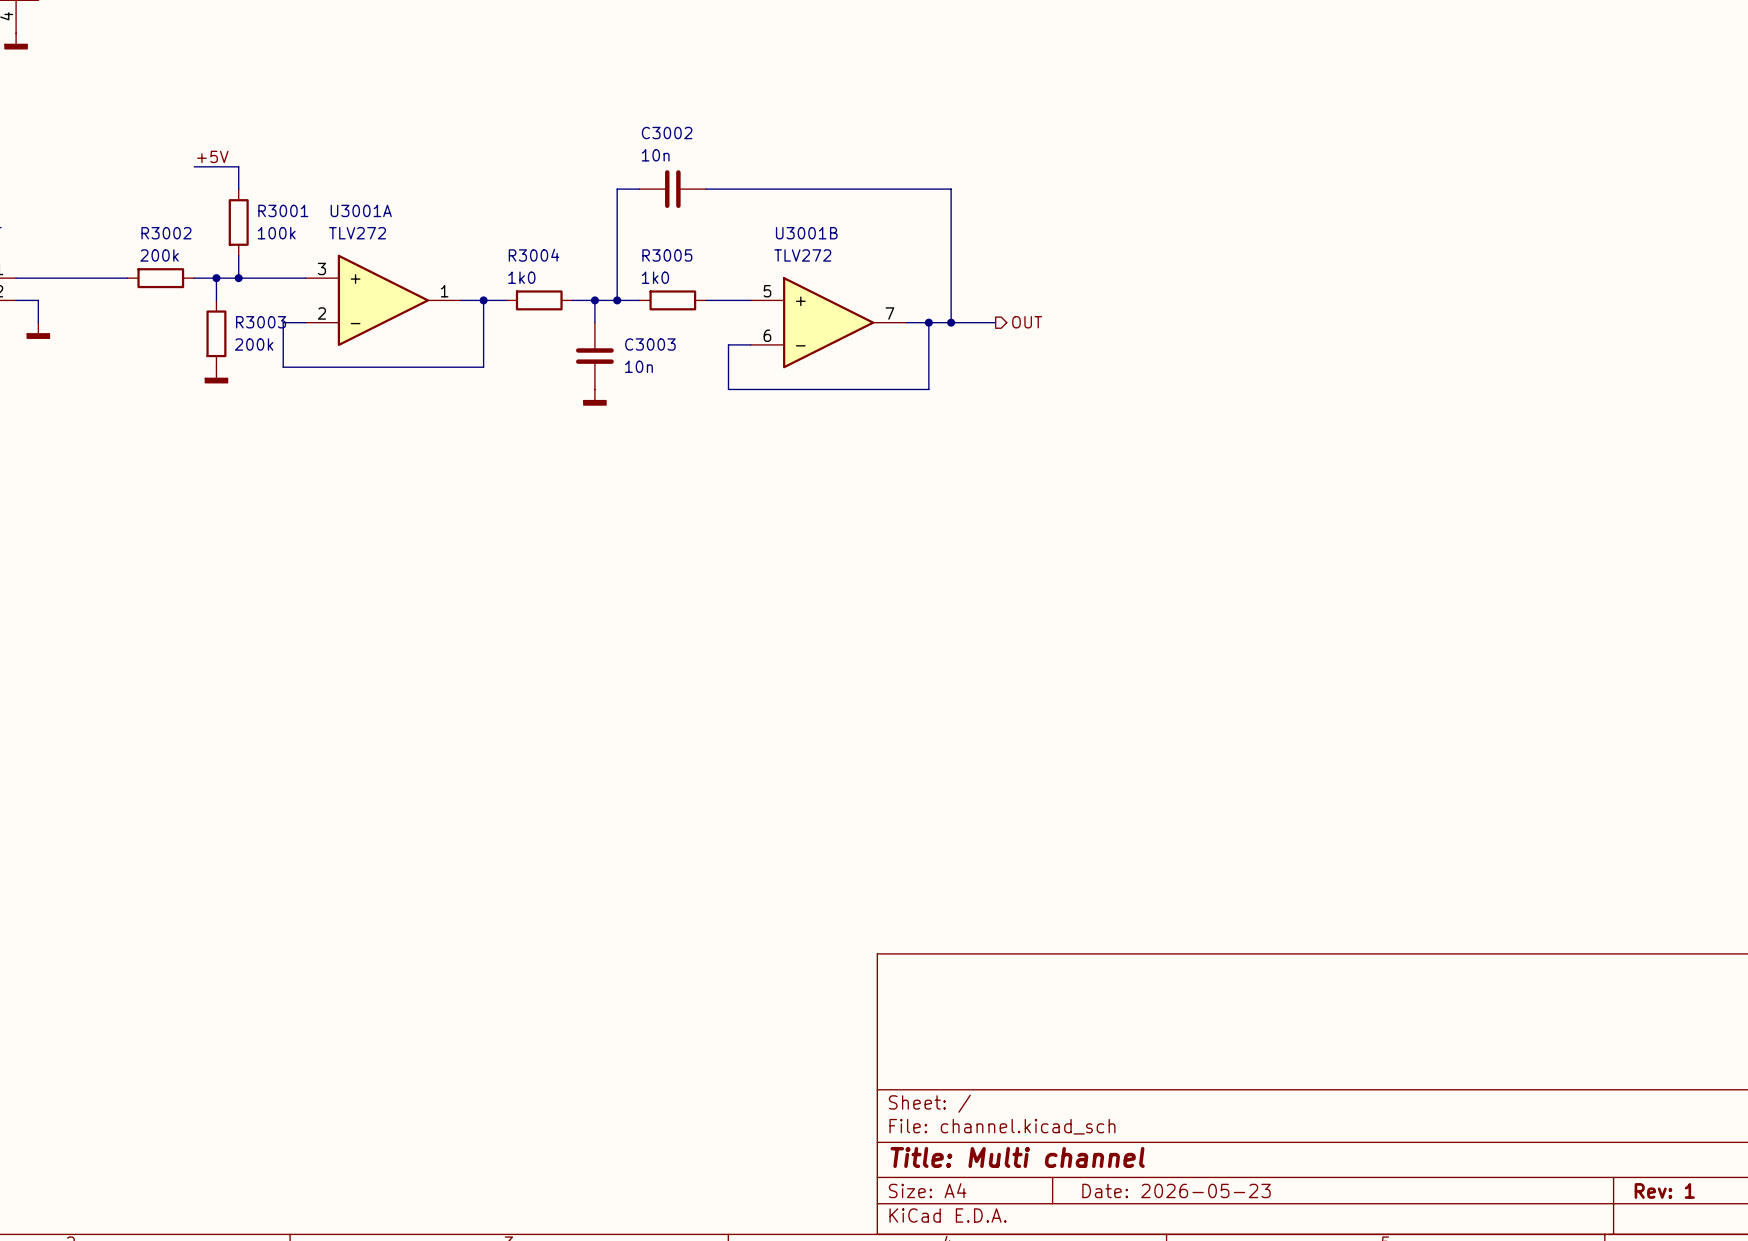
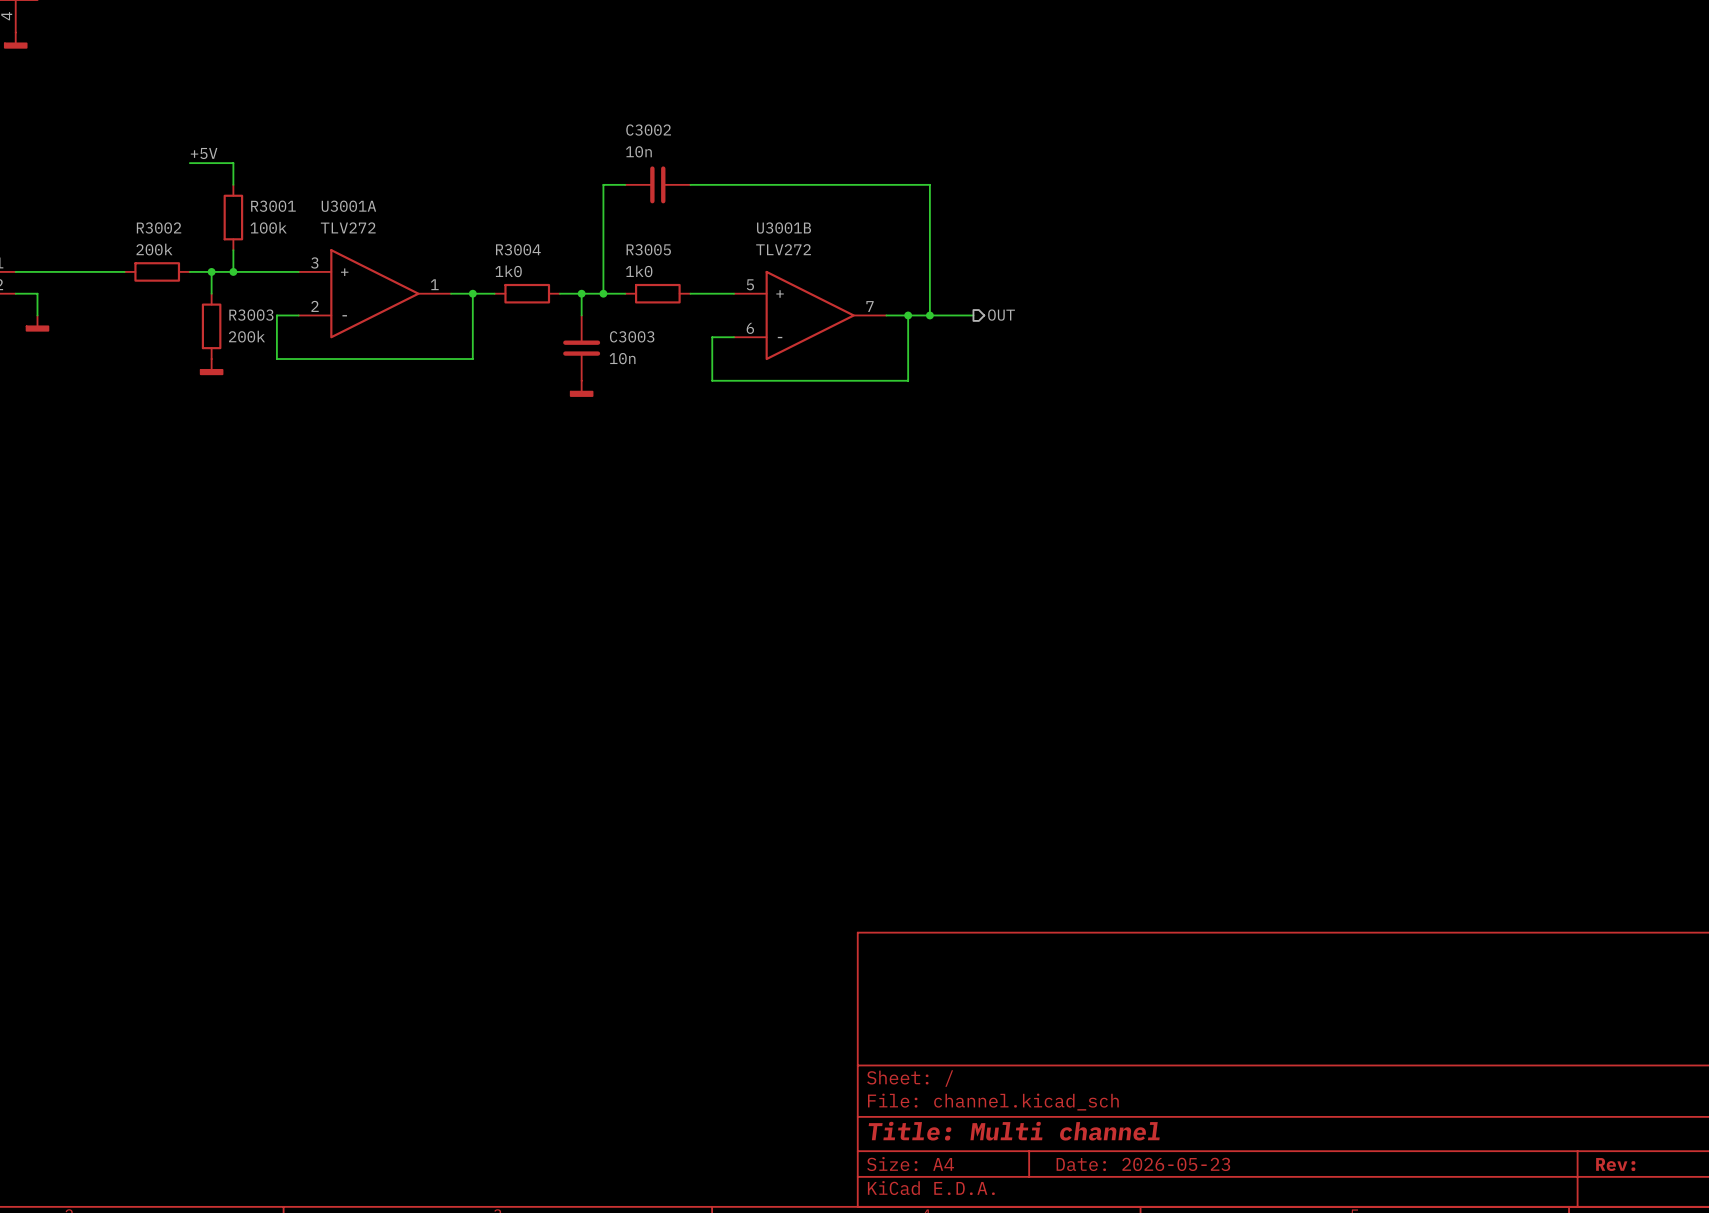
title block: Rev: 1 (1664, 1190) -> Rev: (1615, 1164)

